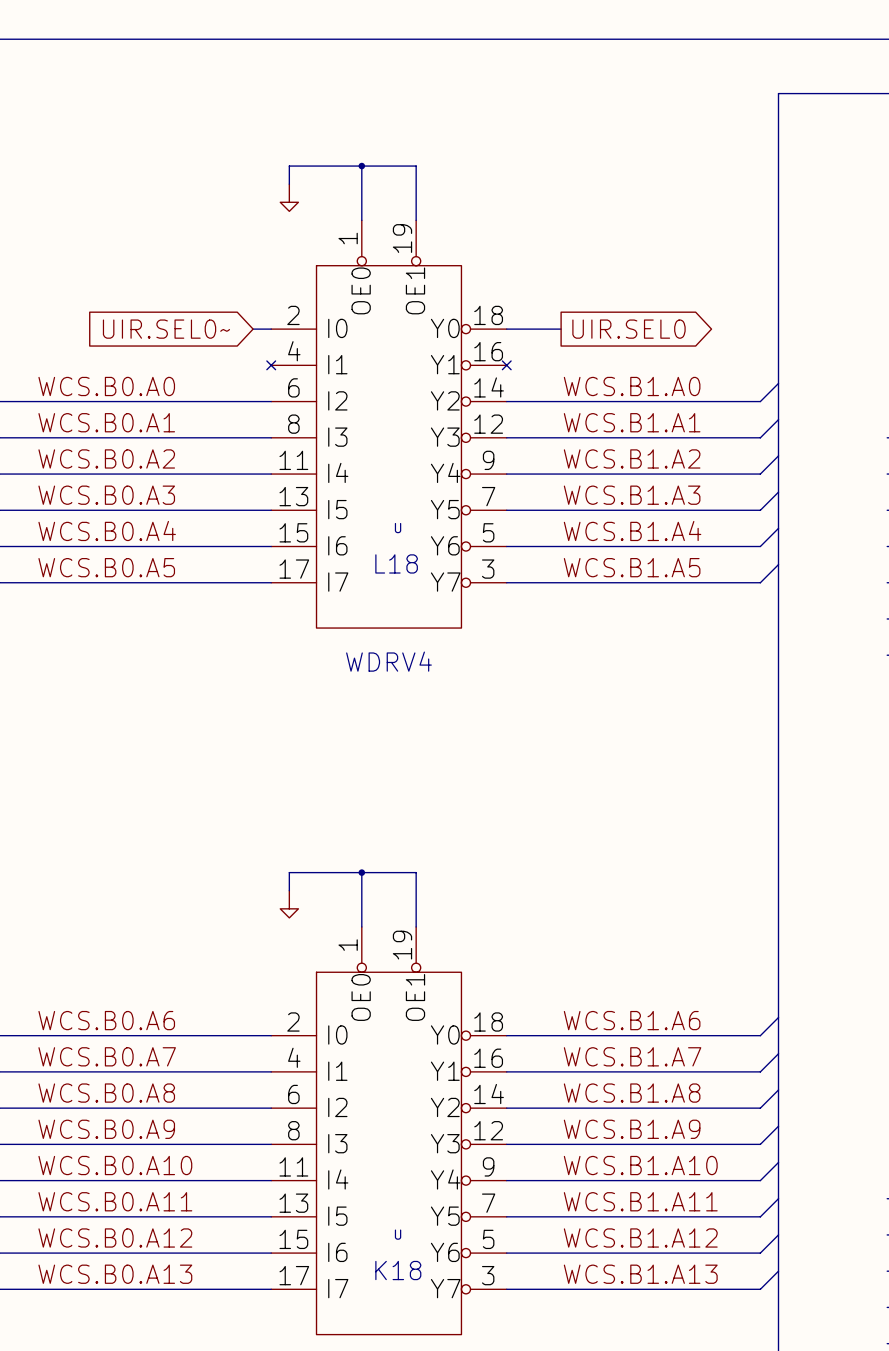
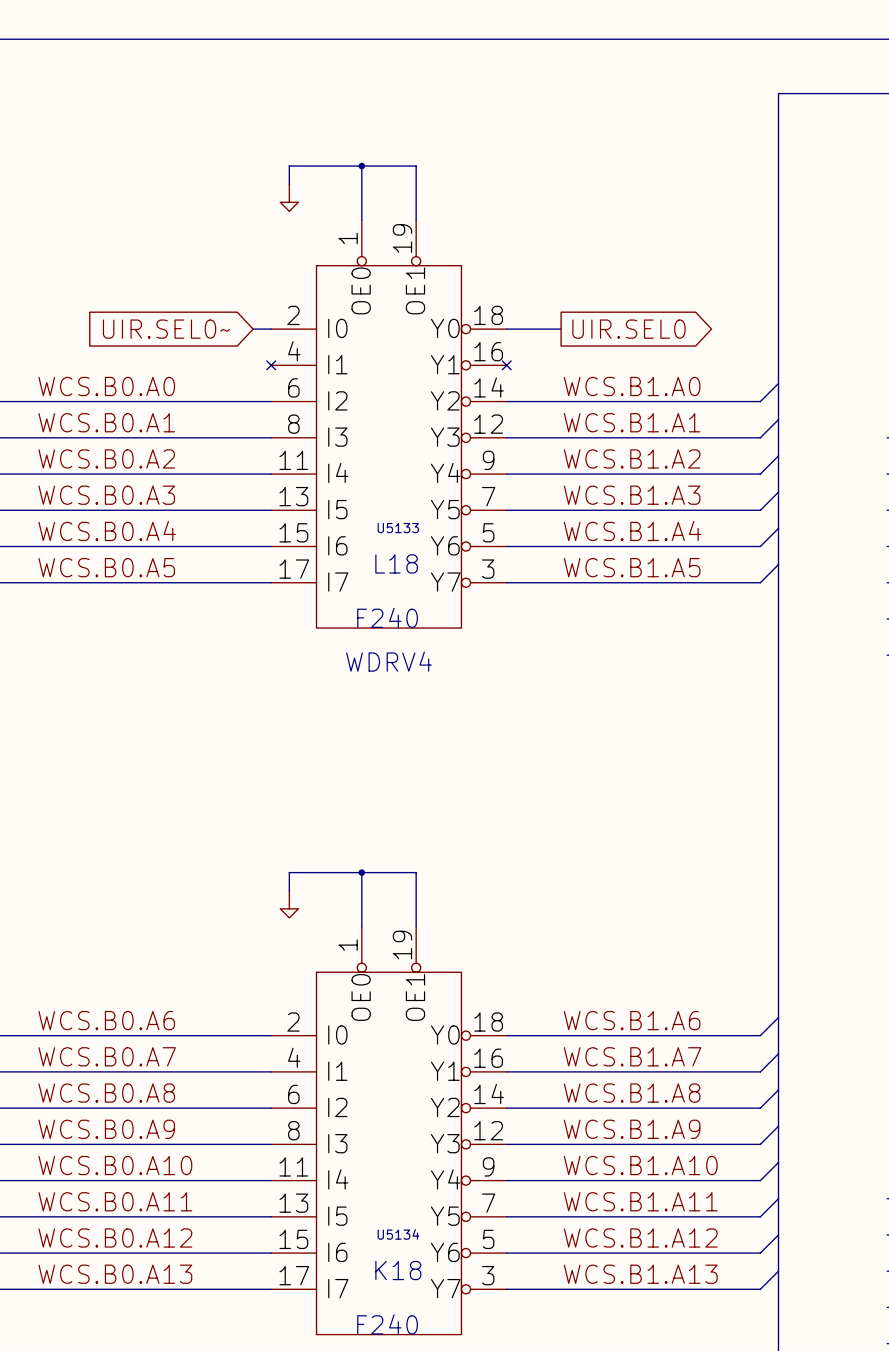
U name: U (398, 528) -> U5133 (398, 528)
U value: none -> F240 (387, 617)
U name: U (398, 1234) -> U5134 (398, 1234)
U value: none -> F240 (387, 1324)

